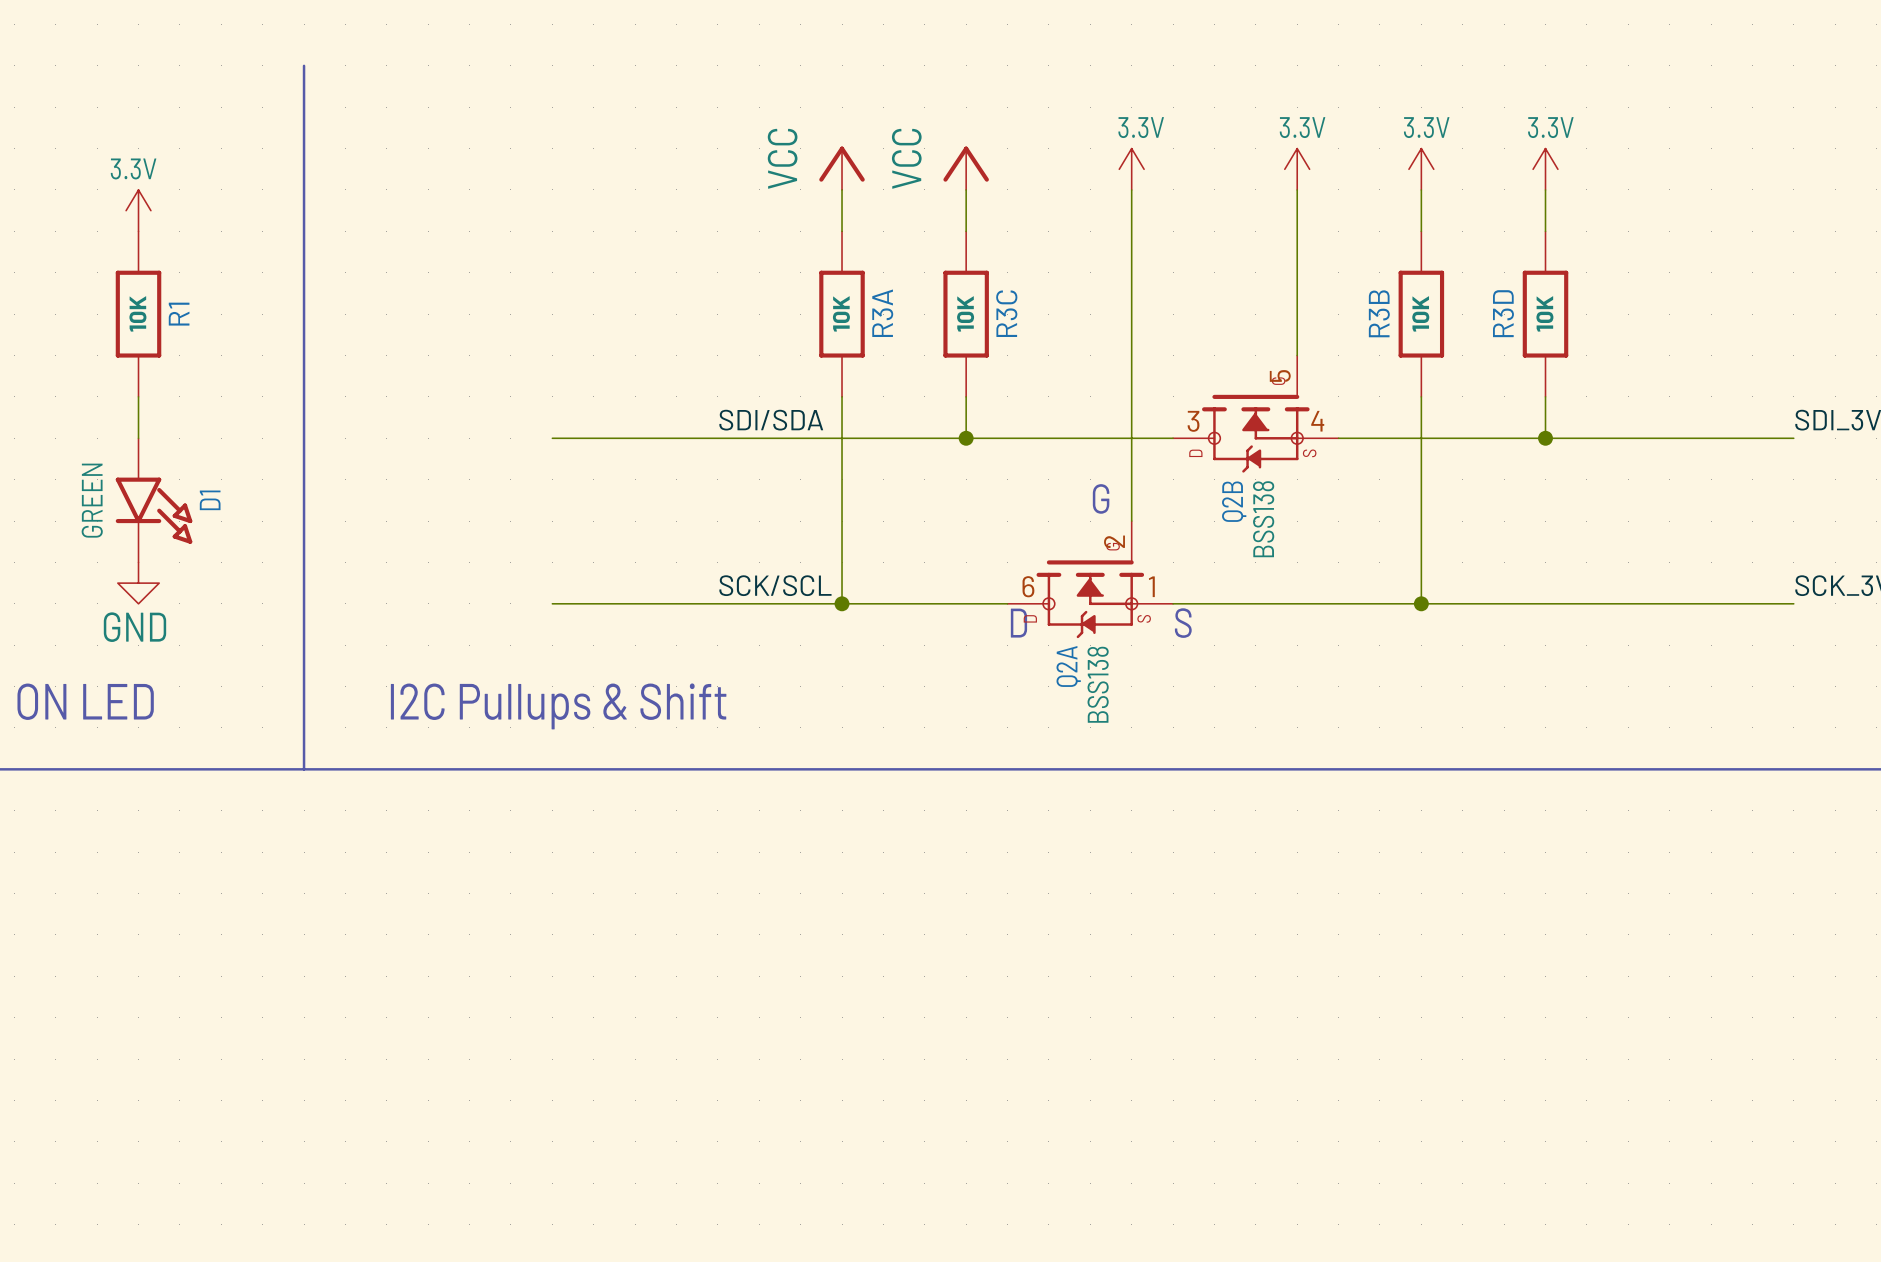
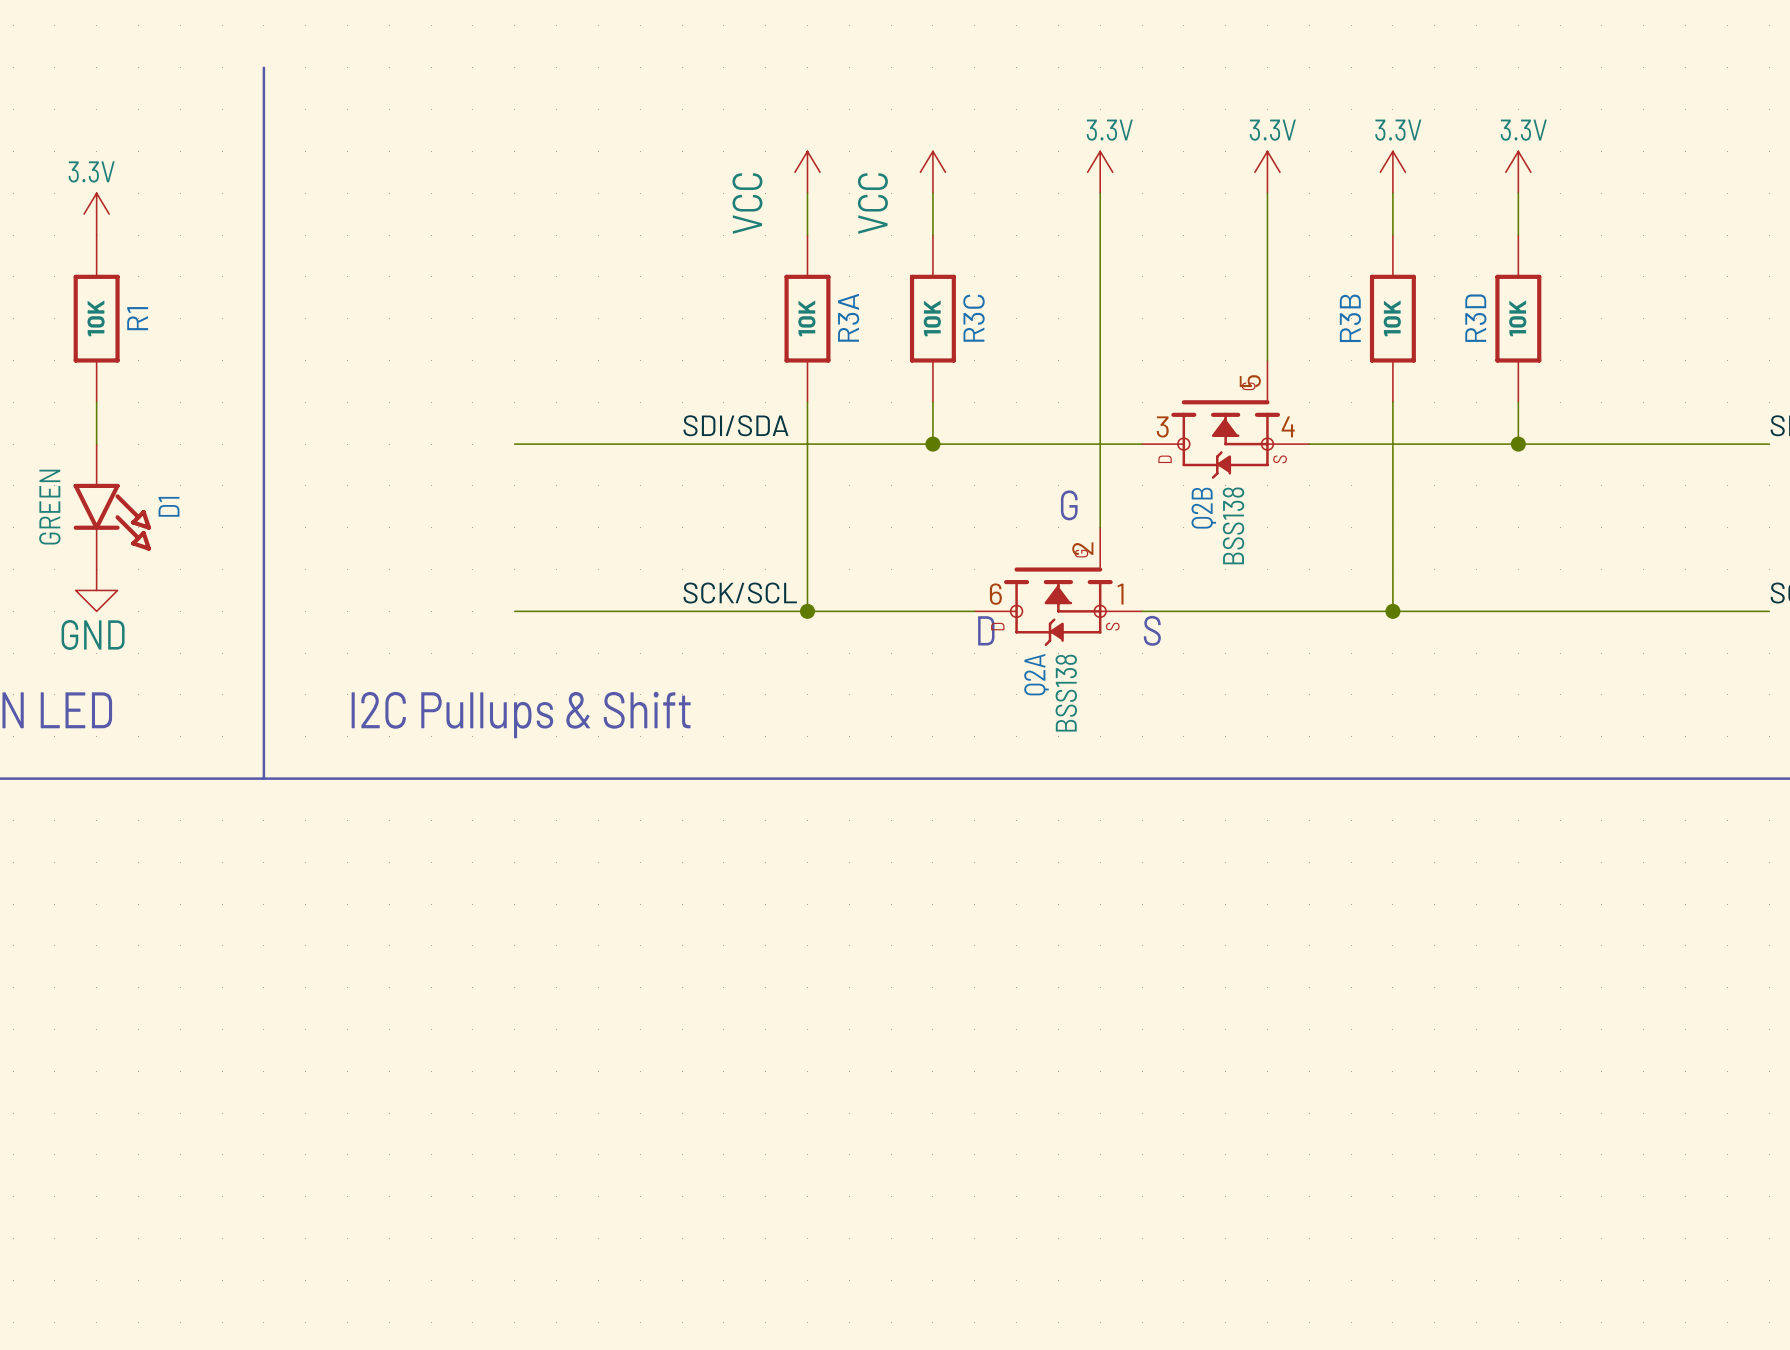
power symbol shape: [819, 146, 865, 190] -> [794, 151, 821, 194]
power symbol shape: [943, 146, 989, 190] -> [920, 151, 946, 194]
power symbol text position: VCC (782, 158) -> VCC (747, 203)
power symbol text position: VCC (906, 158) -> VCC (872, 203)

